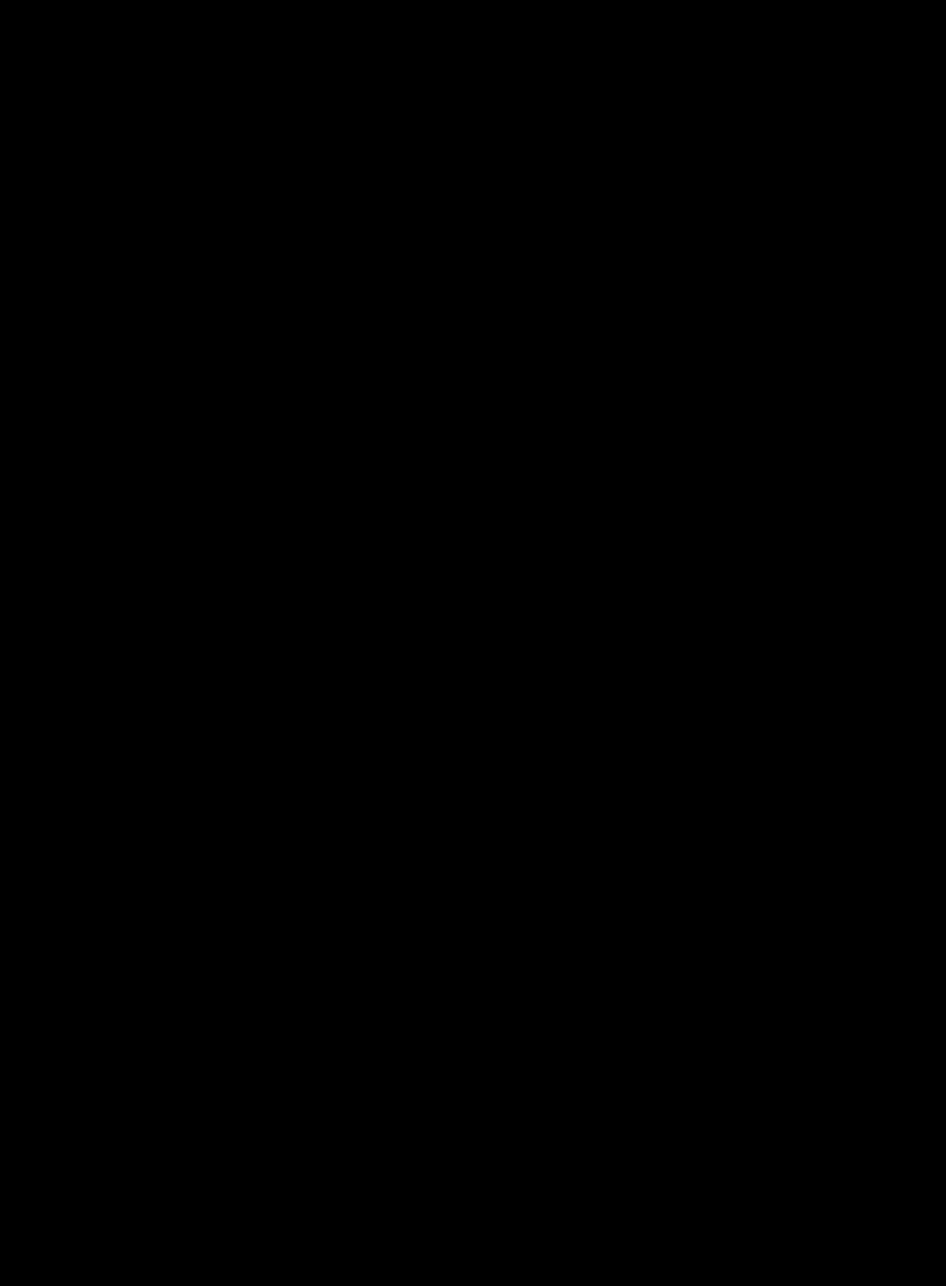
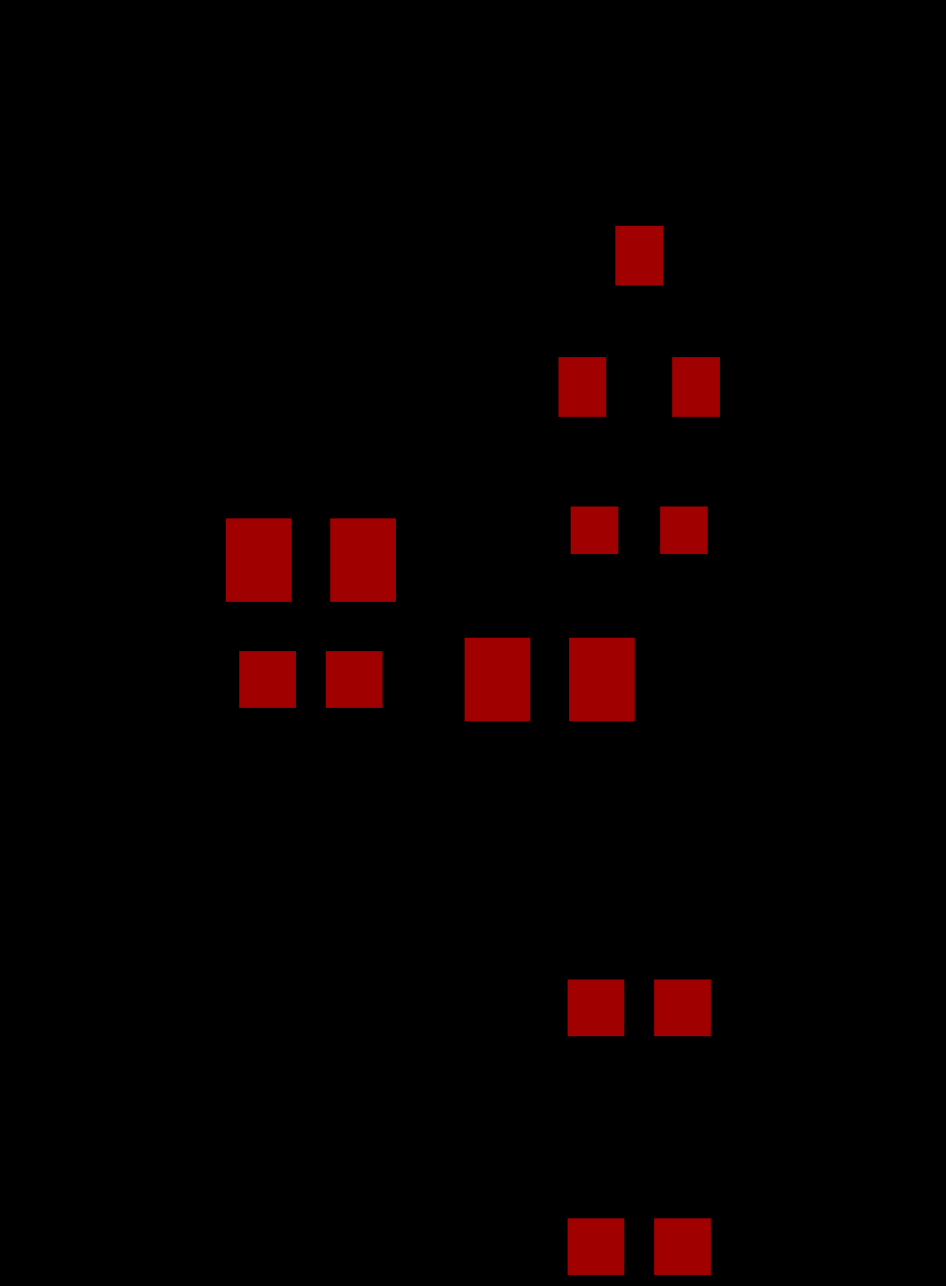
part: none -> (639, 321)
part: none -> (639, 530)
part: none -> (310, 560)
part: none -> (310, 679)
part: none -> (549, 679)
part: none -> (639, 1007)
part: none -> (639, 1246)

